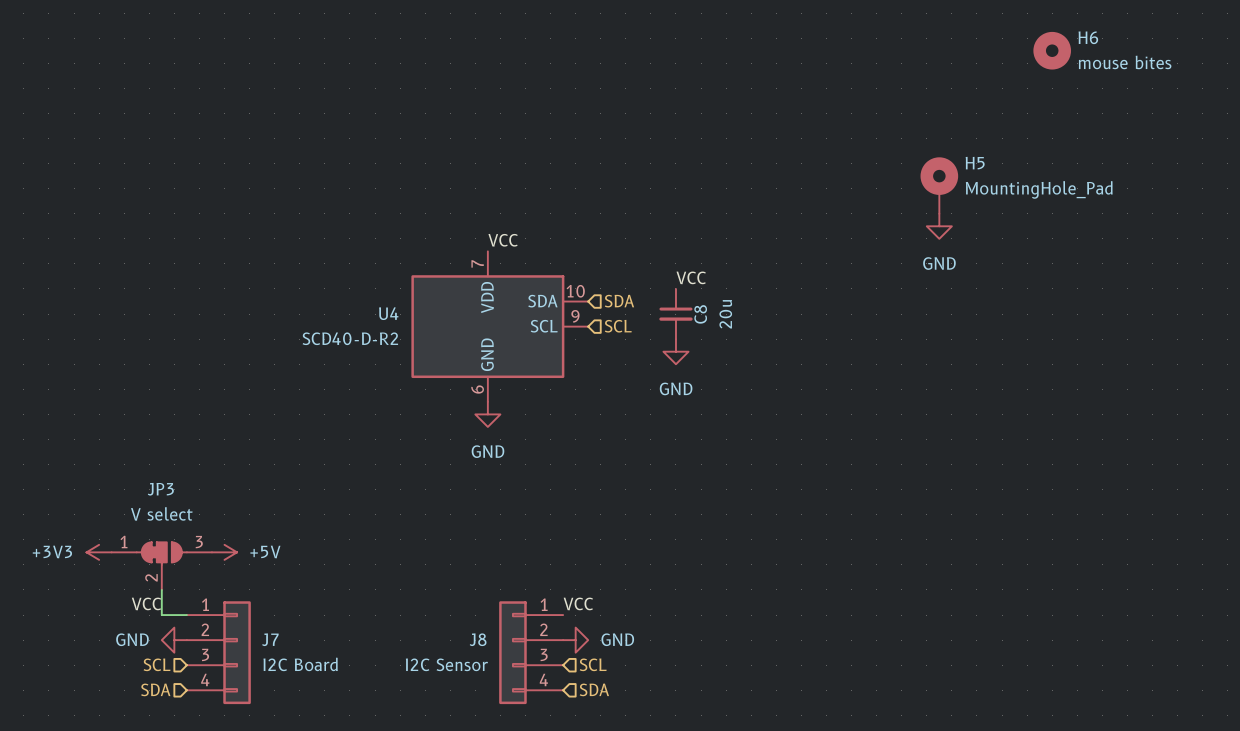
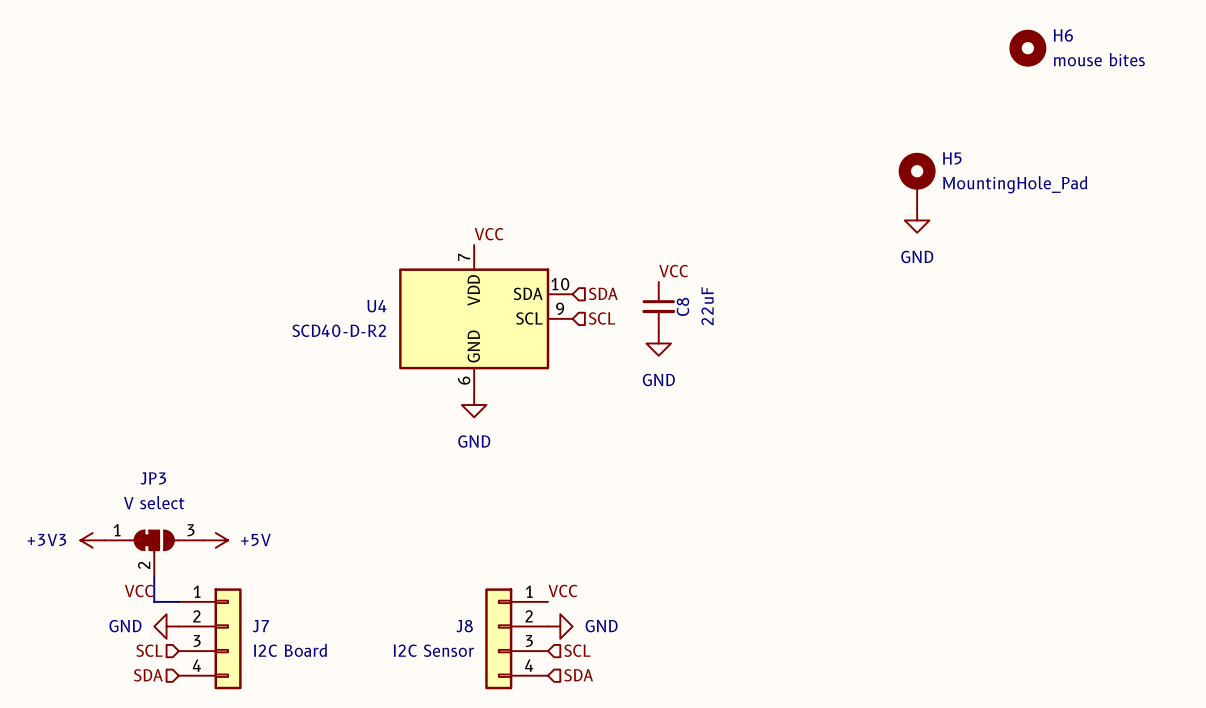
C8 value: 20u (725, 314) -> 22uF (707, 306)

